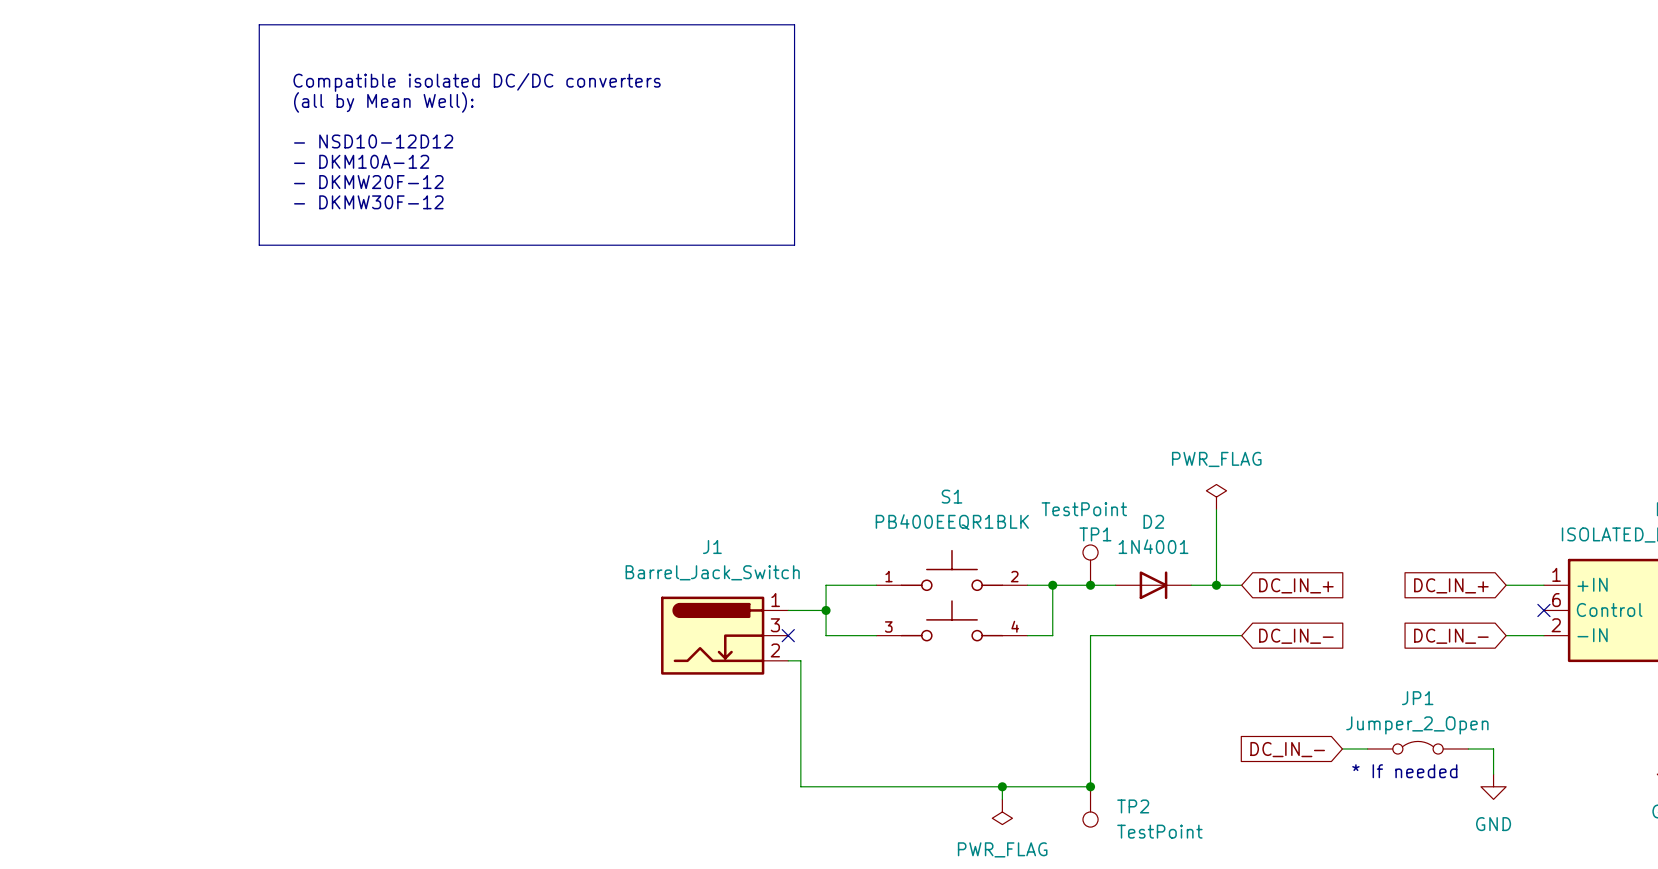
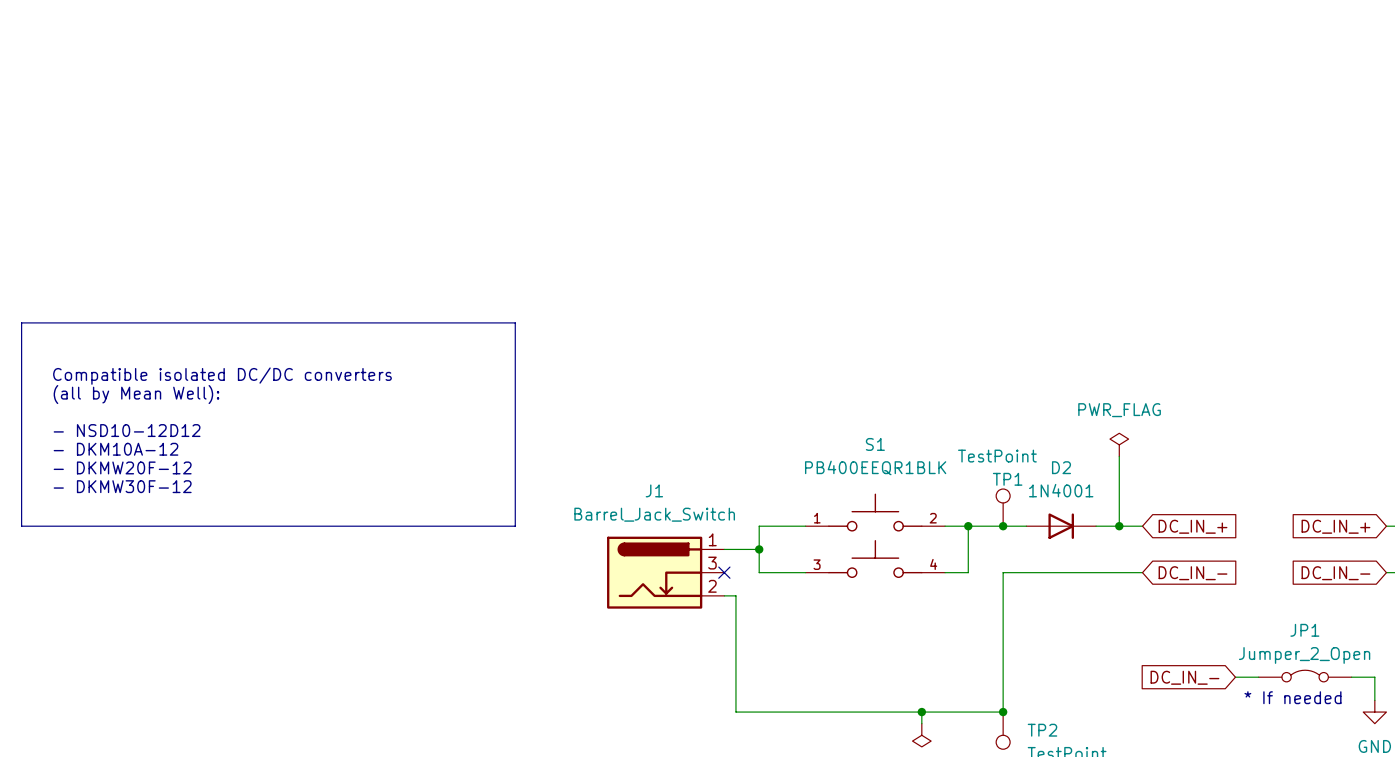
line: (259, 24) (794, 24) (794, 245) (259, 245) (259, 24) -> none
text: Compatible isolated DC/DC converters (477, 82) -> none
text: (all by Mean Well): (383, 102) -> none
text: - NSD10-12D12 (373, 141) -> none
text: - DKM10A-12 (361, 161) -> none
text: - DKMW20F-12 (368, 182) -> none
text: - DKMW30F-12 (368, 202) -> none
line: none -> (21, 322) (515, 322) (515, 526) (21, 526) (21, 322)
text: none -> Compatible isolated DC/DC converters (222, 376)
text: none -> (all by Mean Well): (136, 394)
text: none -> - NSD10-12D12 (127, 430)
text: none -> - DKM10A-12 (116, 449)
text: none -> - DKMW20F-12 (122, 467)
text: none -> - DKMW30F-12 (122, 486)

